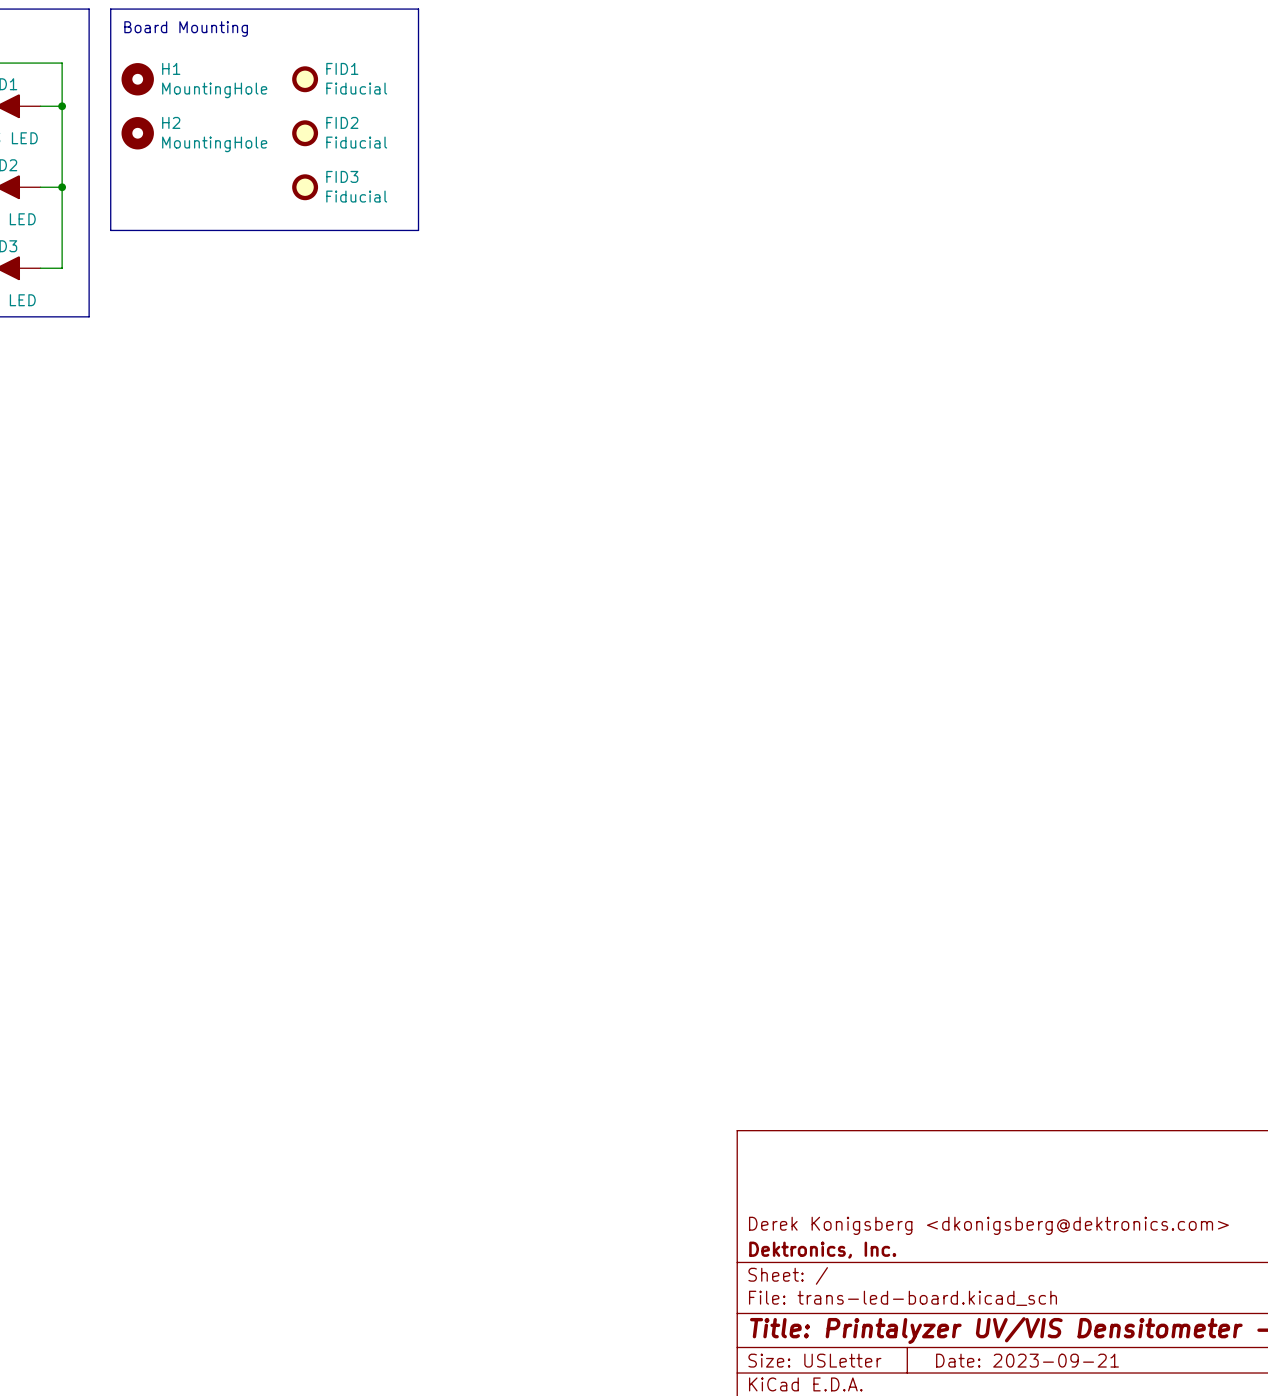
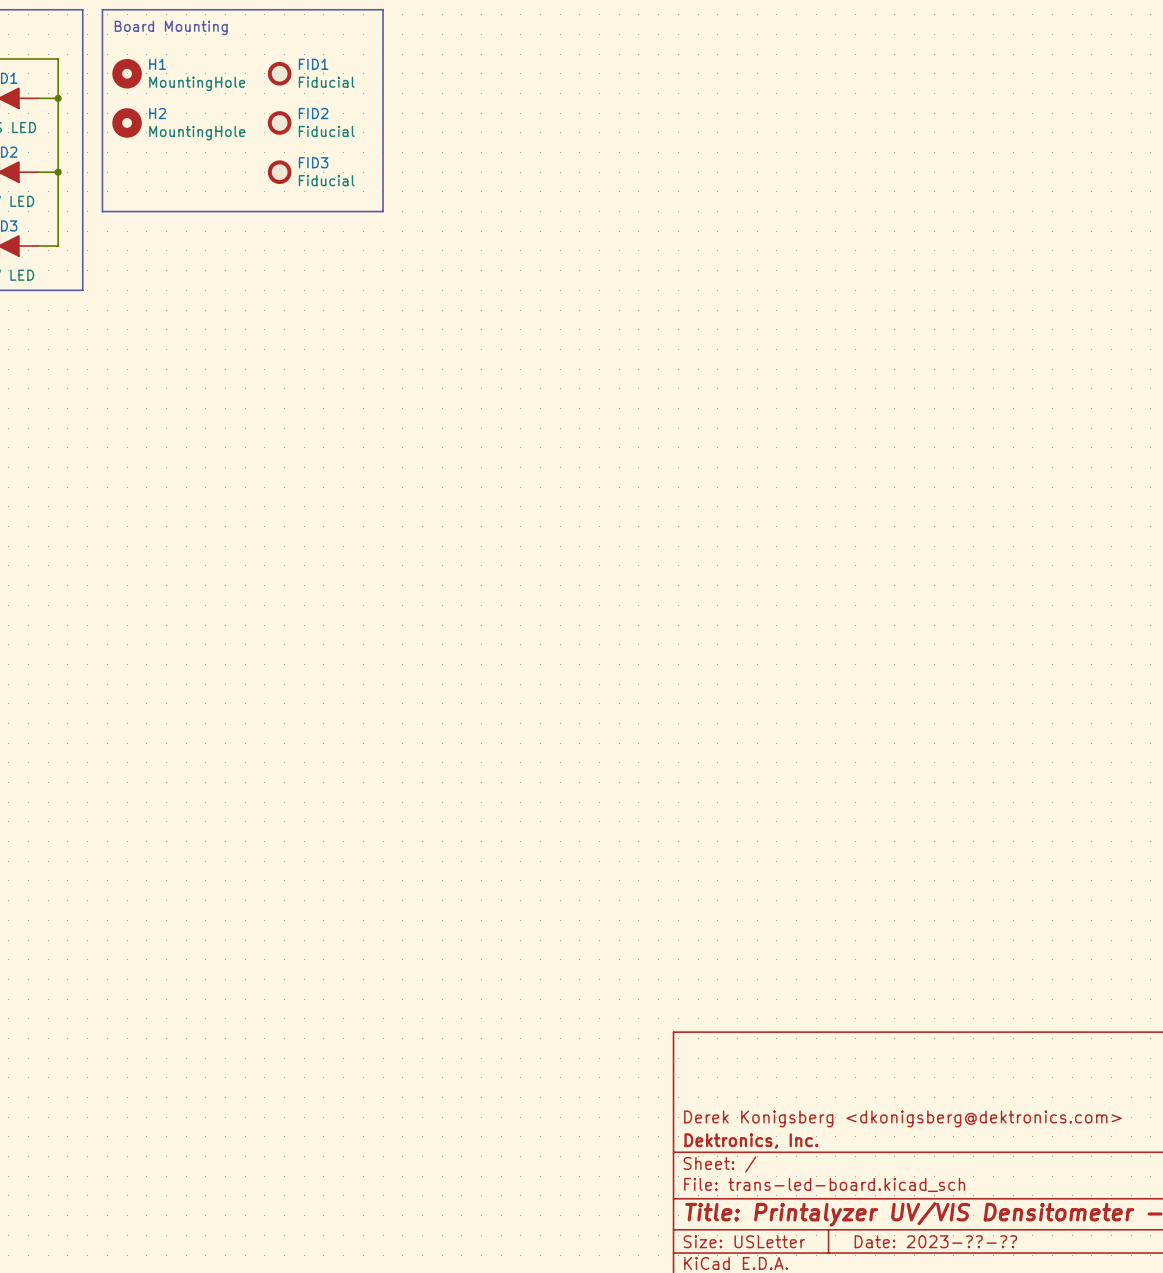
title block: Date: 2023-09-21 (1027, 1360) -> Date: 2023-??-?? (935, 1241)

